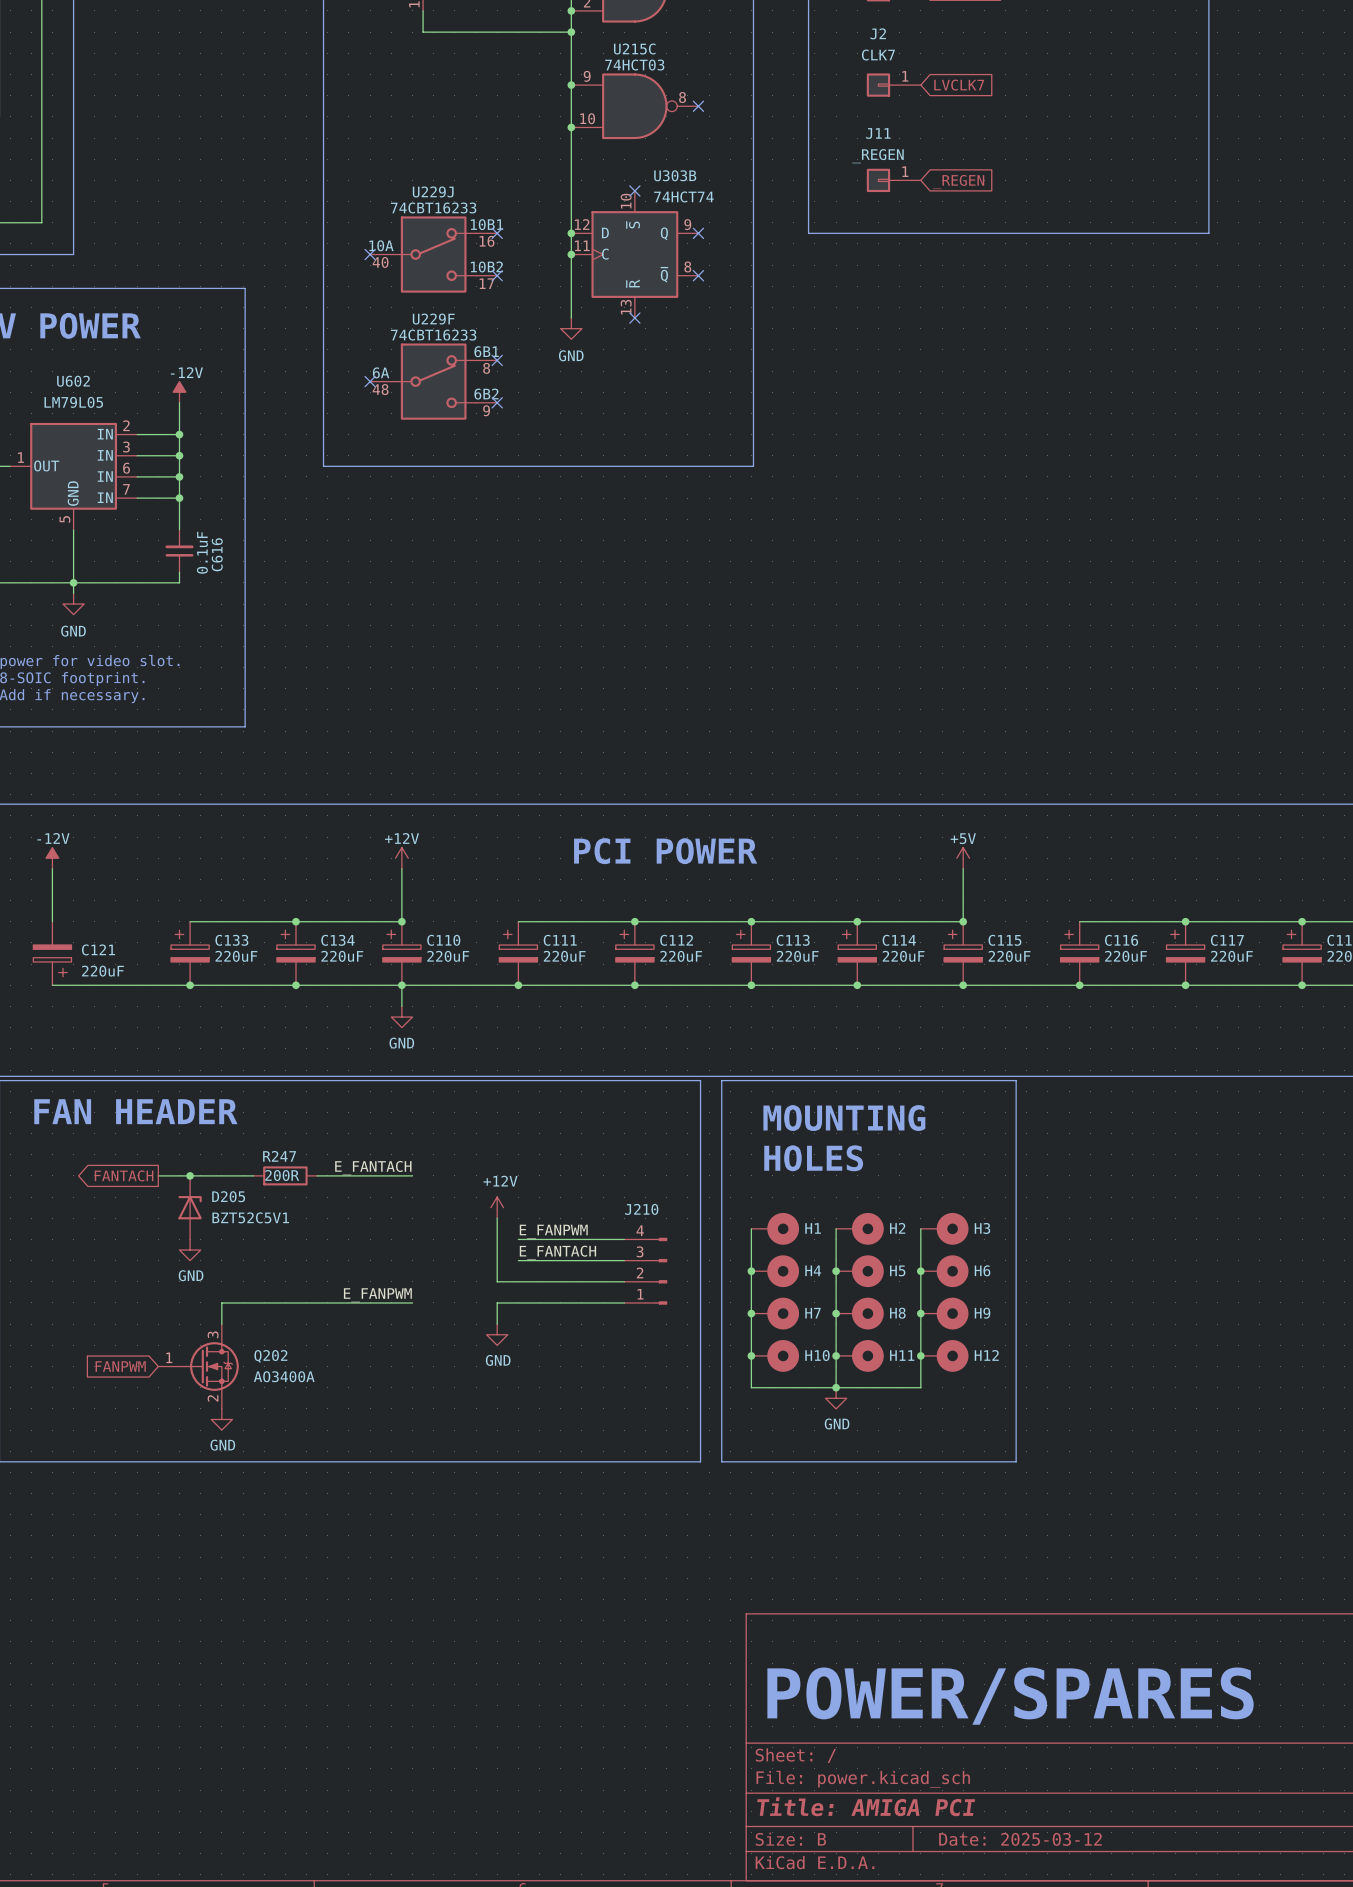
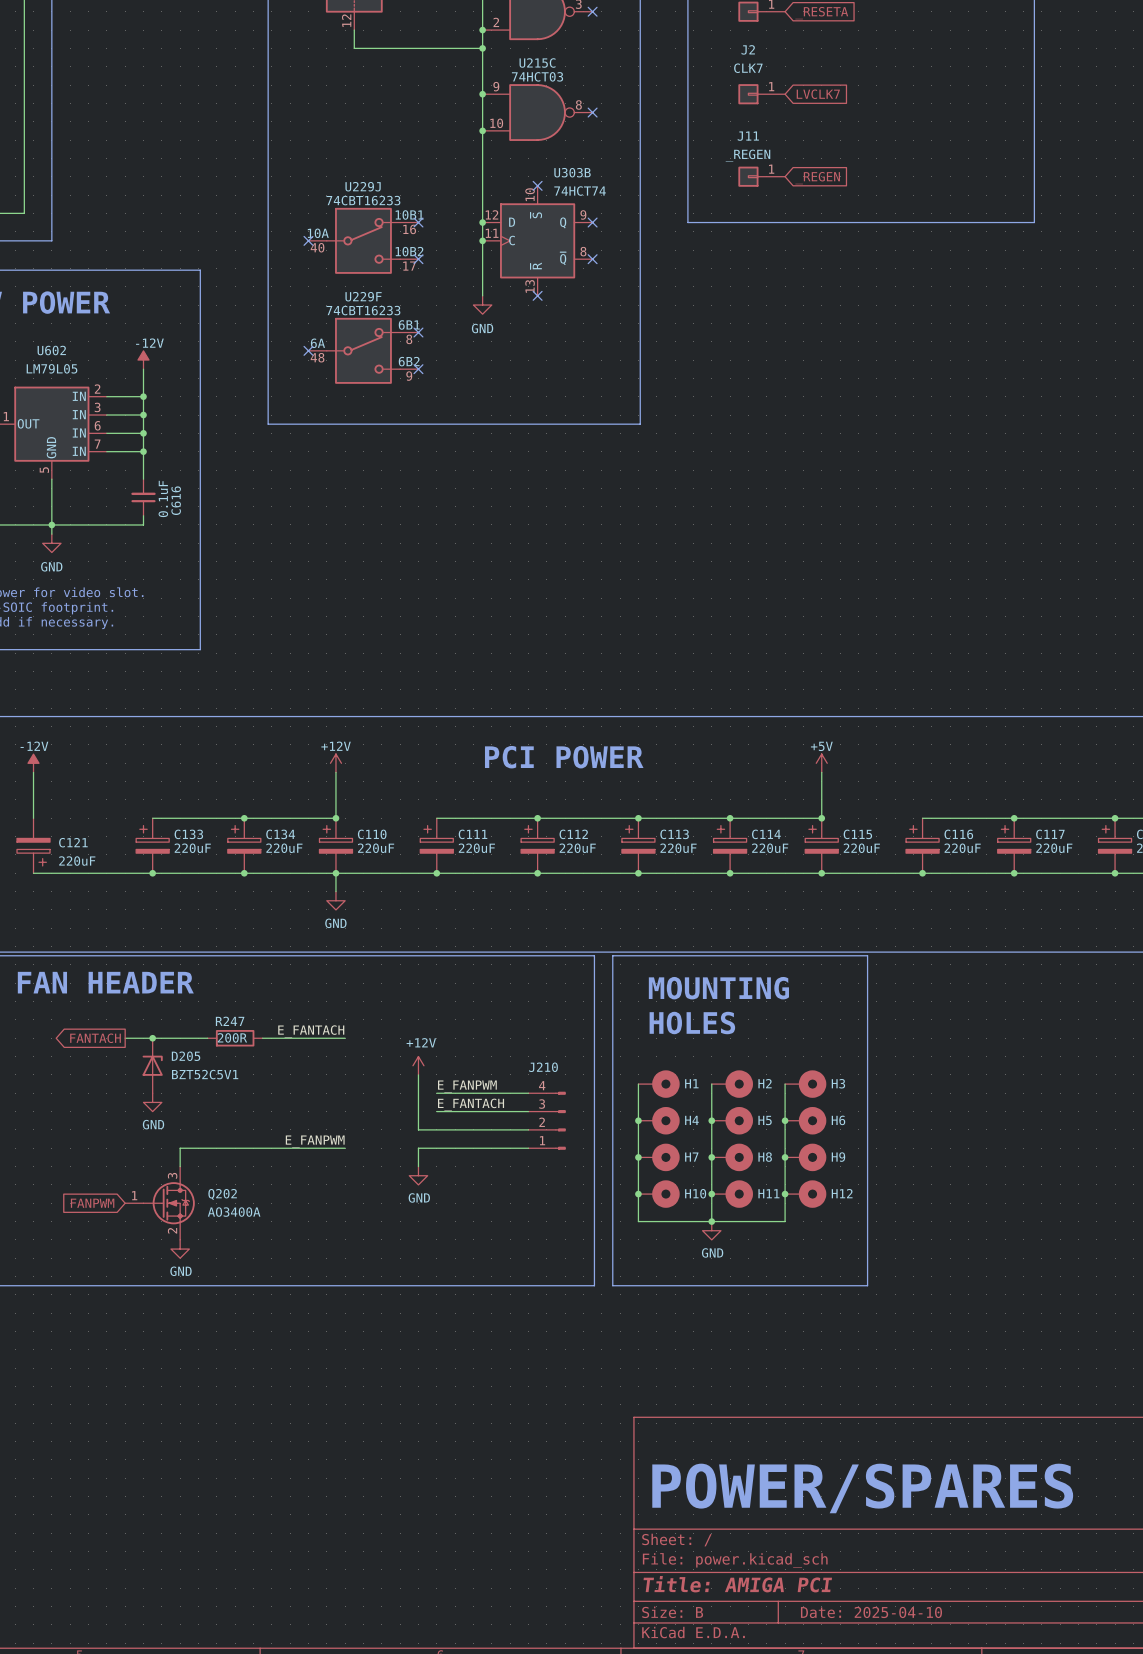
title block: Date: 2025-03-12 (1020, 1839) -> Date: 2025-04-10 (871, 1612)

